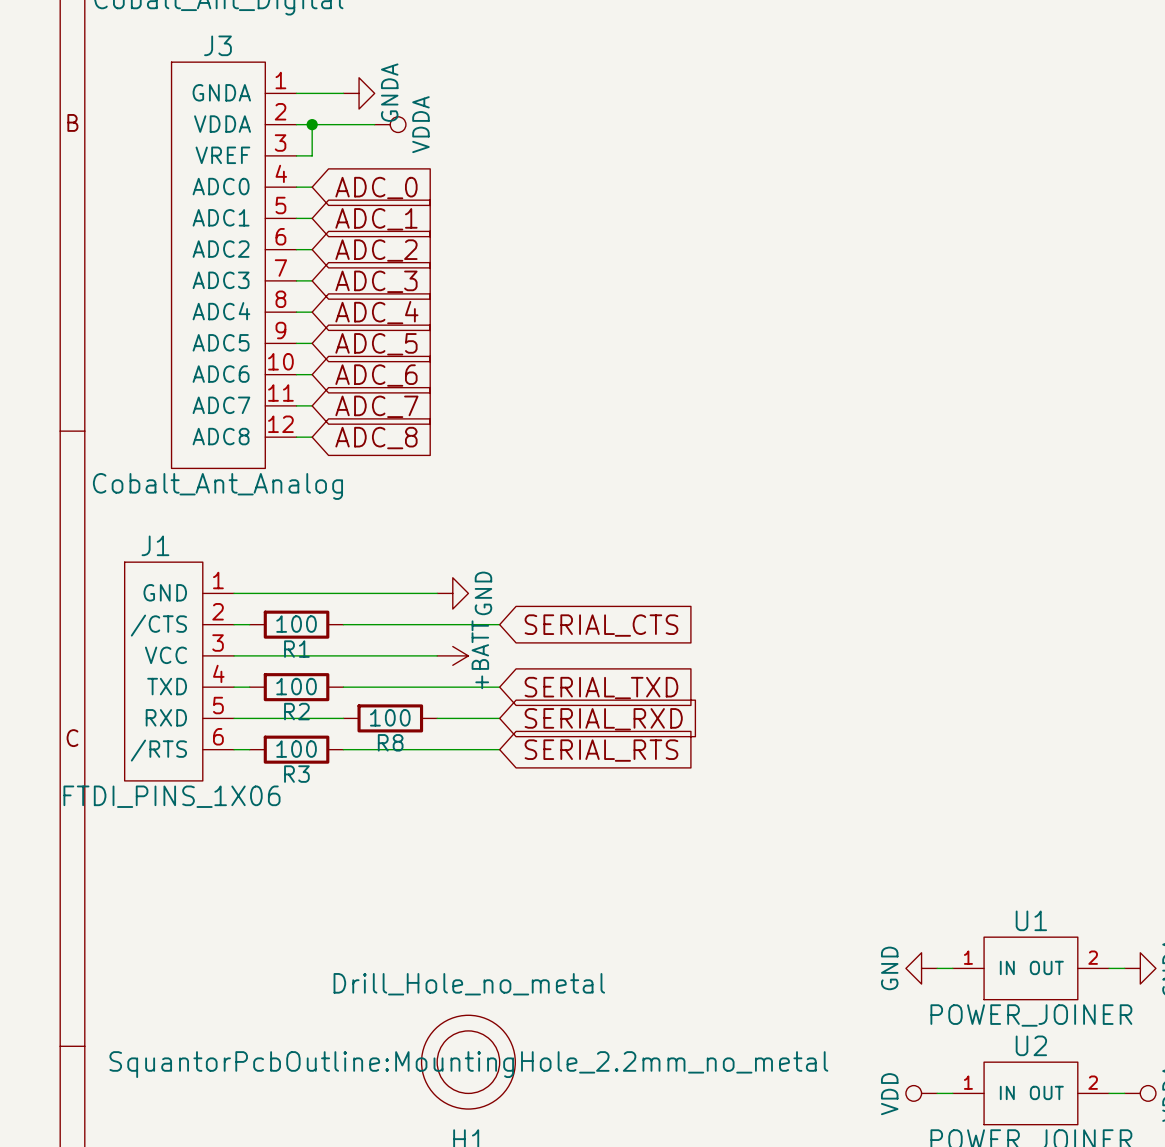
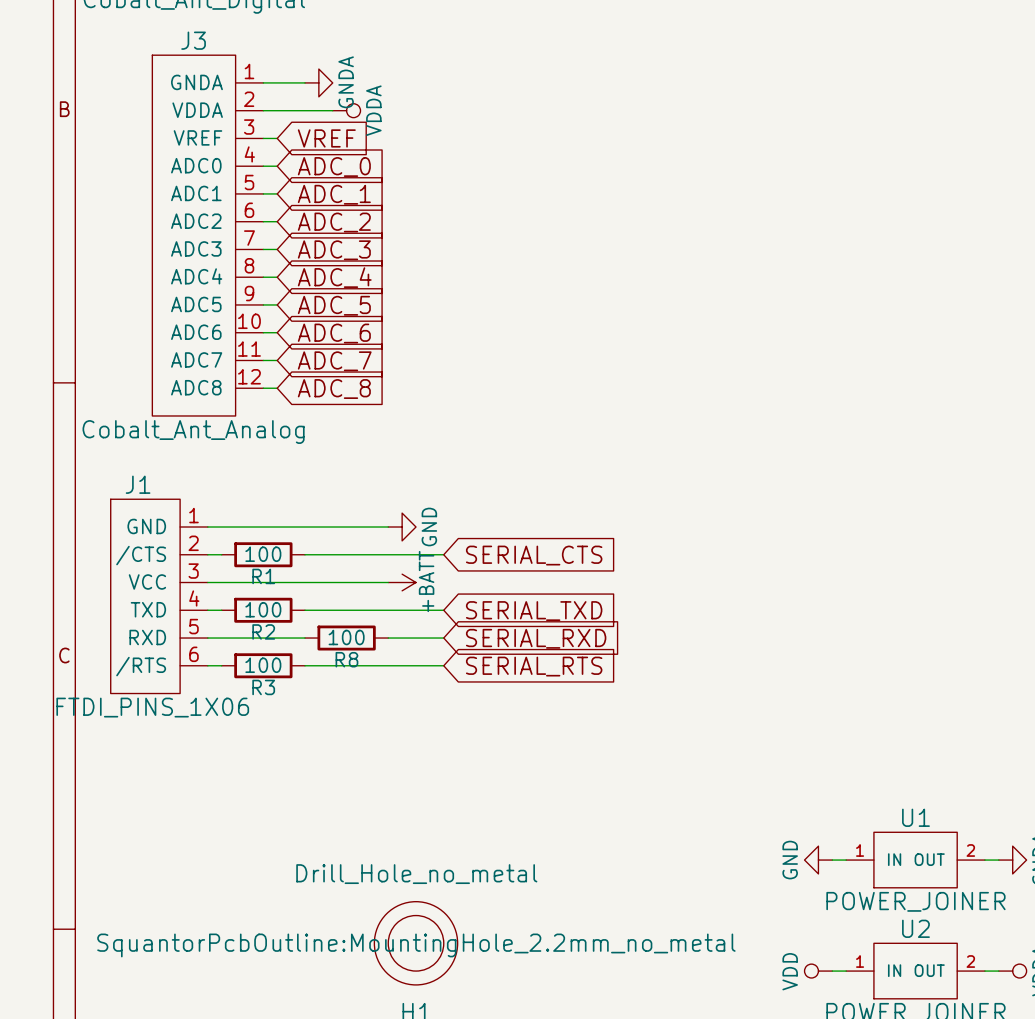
wire: (312, 124) (312, 155) -> none
junction: (312, 124) -> none
global label: none -> VREF (326, 138)

